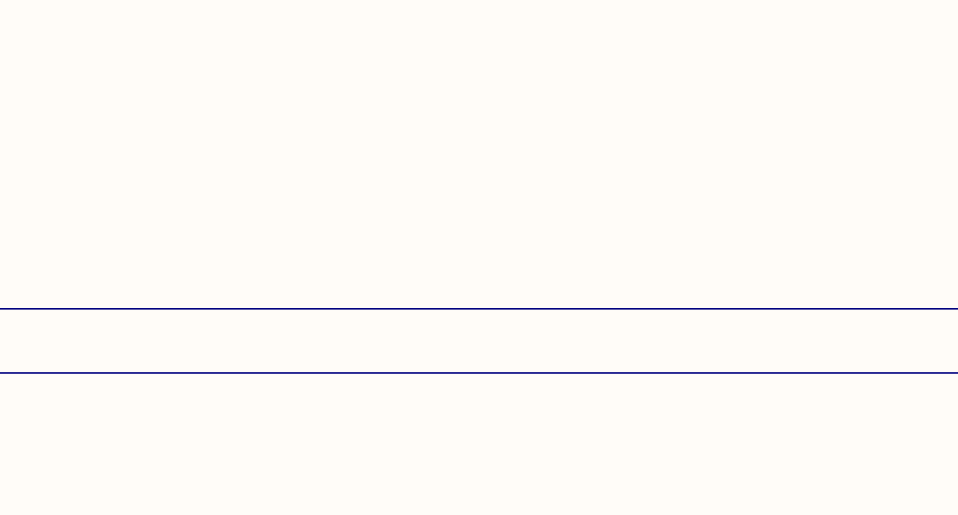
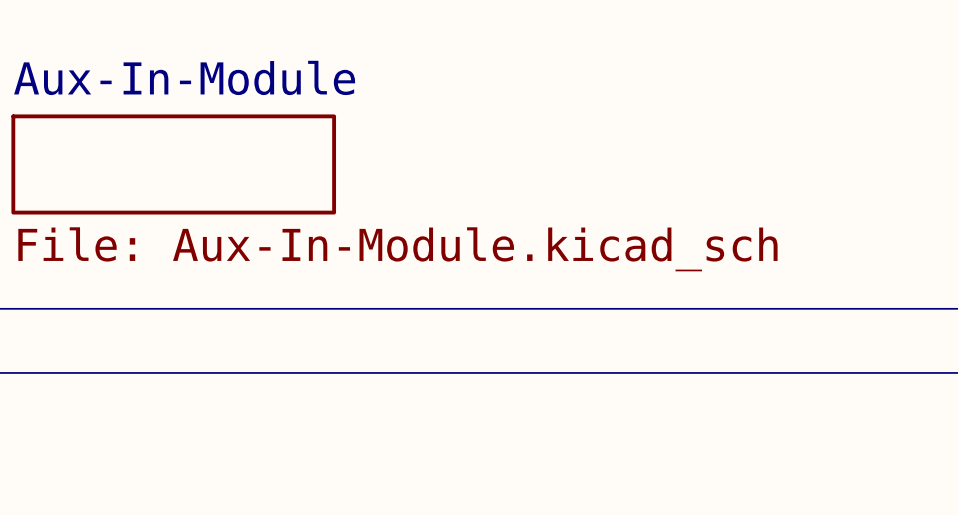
sheet Aux-In-Module: none -> File: Aux-In-Module.kicad_sch (173, 164)

